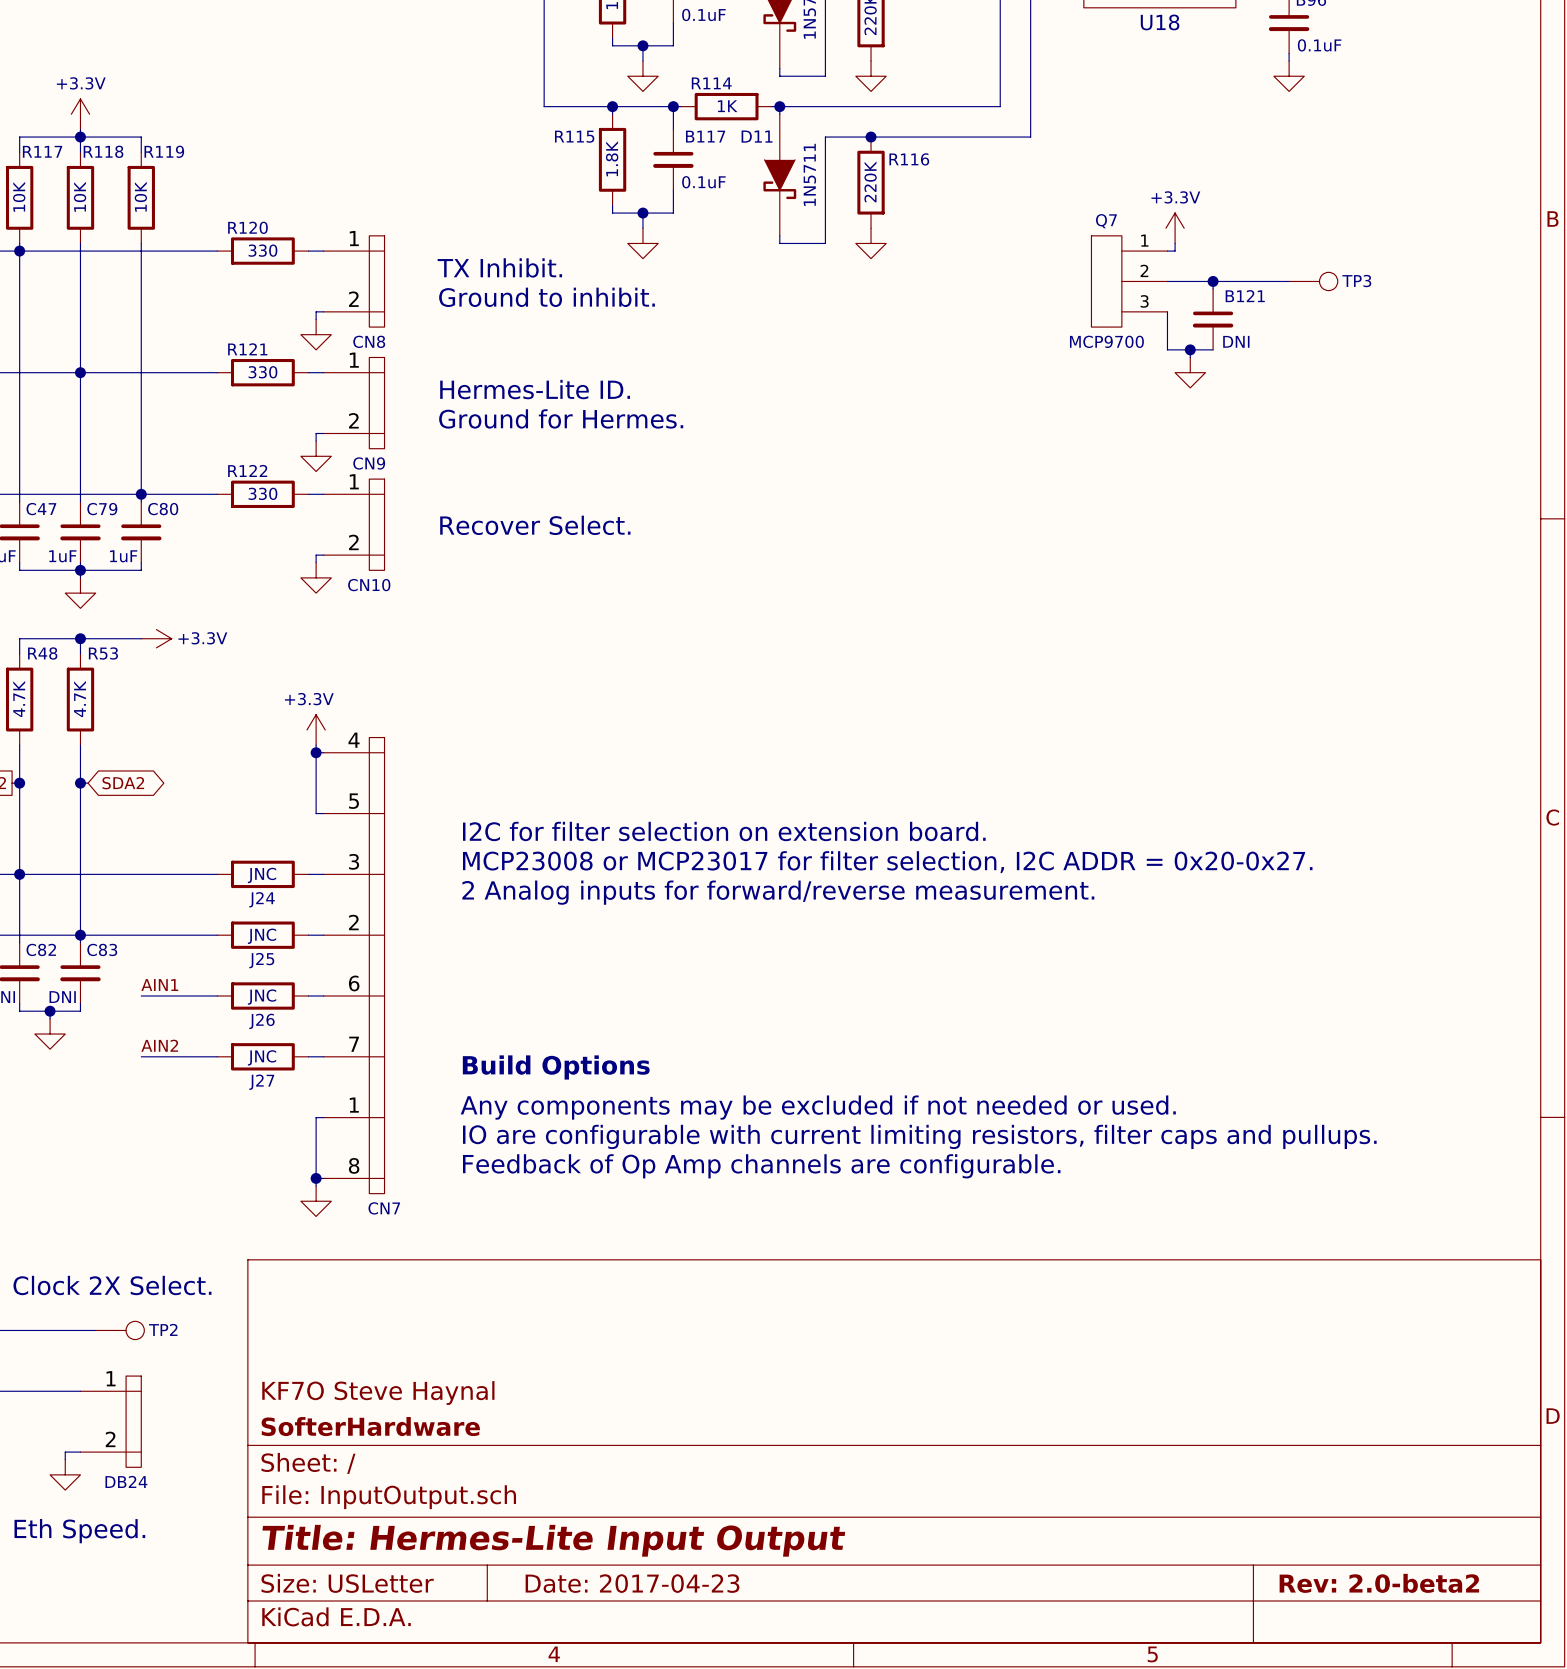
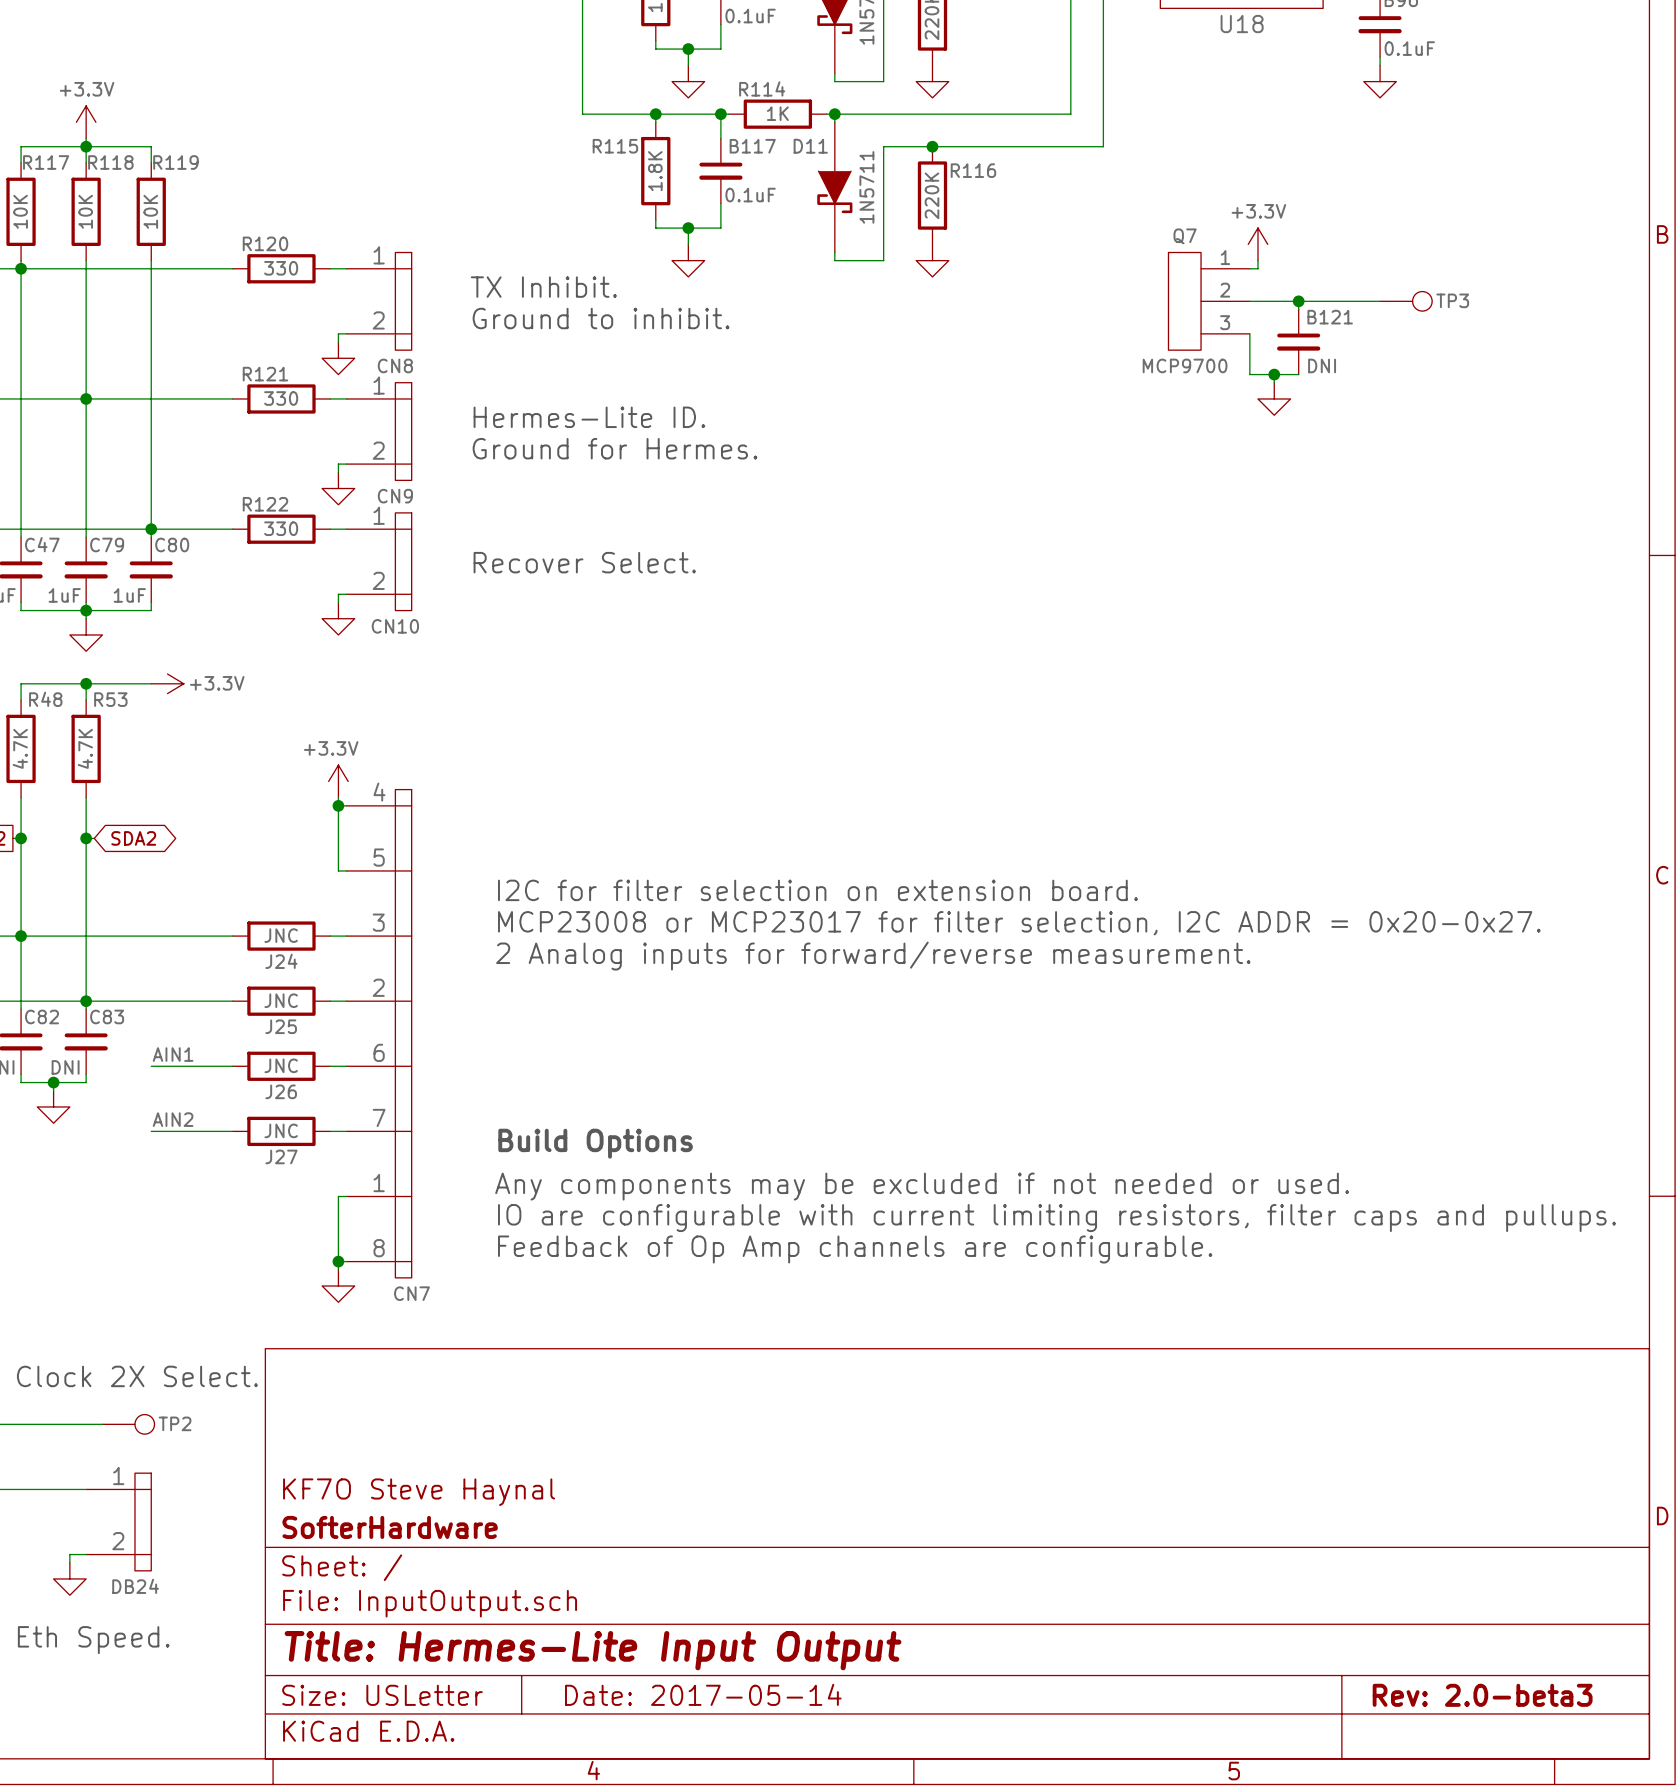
title block: Date: 2017-04-23 (632, 1583) -> Date: 2017-05-14 (703, 1694)
title block: Rev: 2.0-beta2 (1379, 1583) -> Rev: 2.0-beta3 (1482, 1695)

